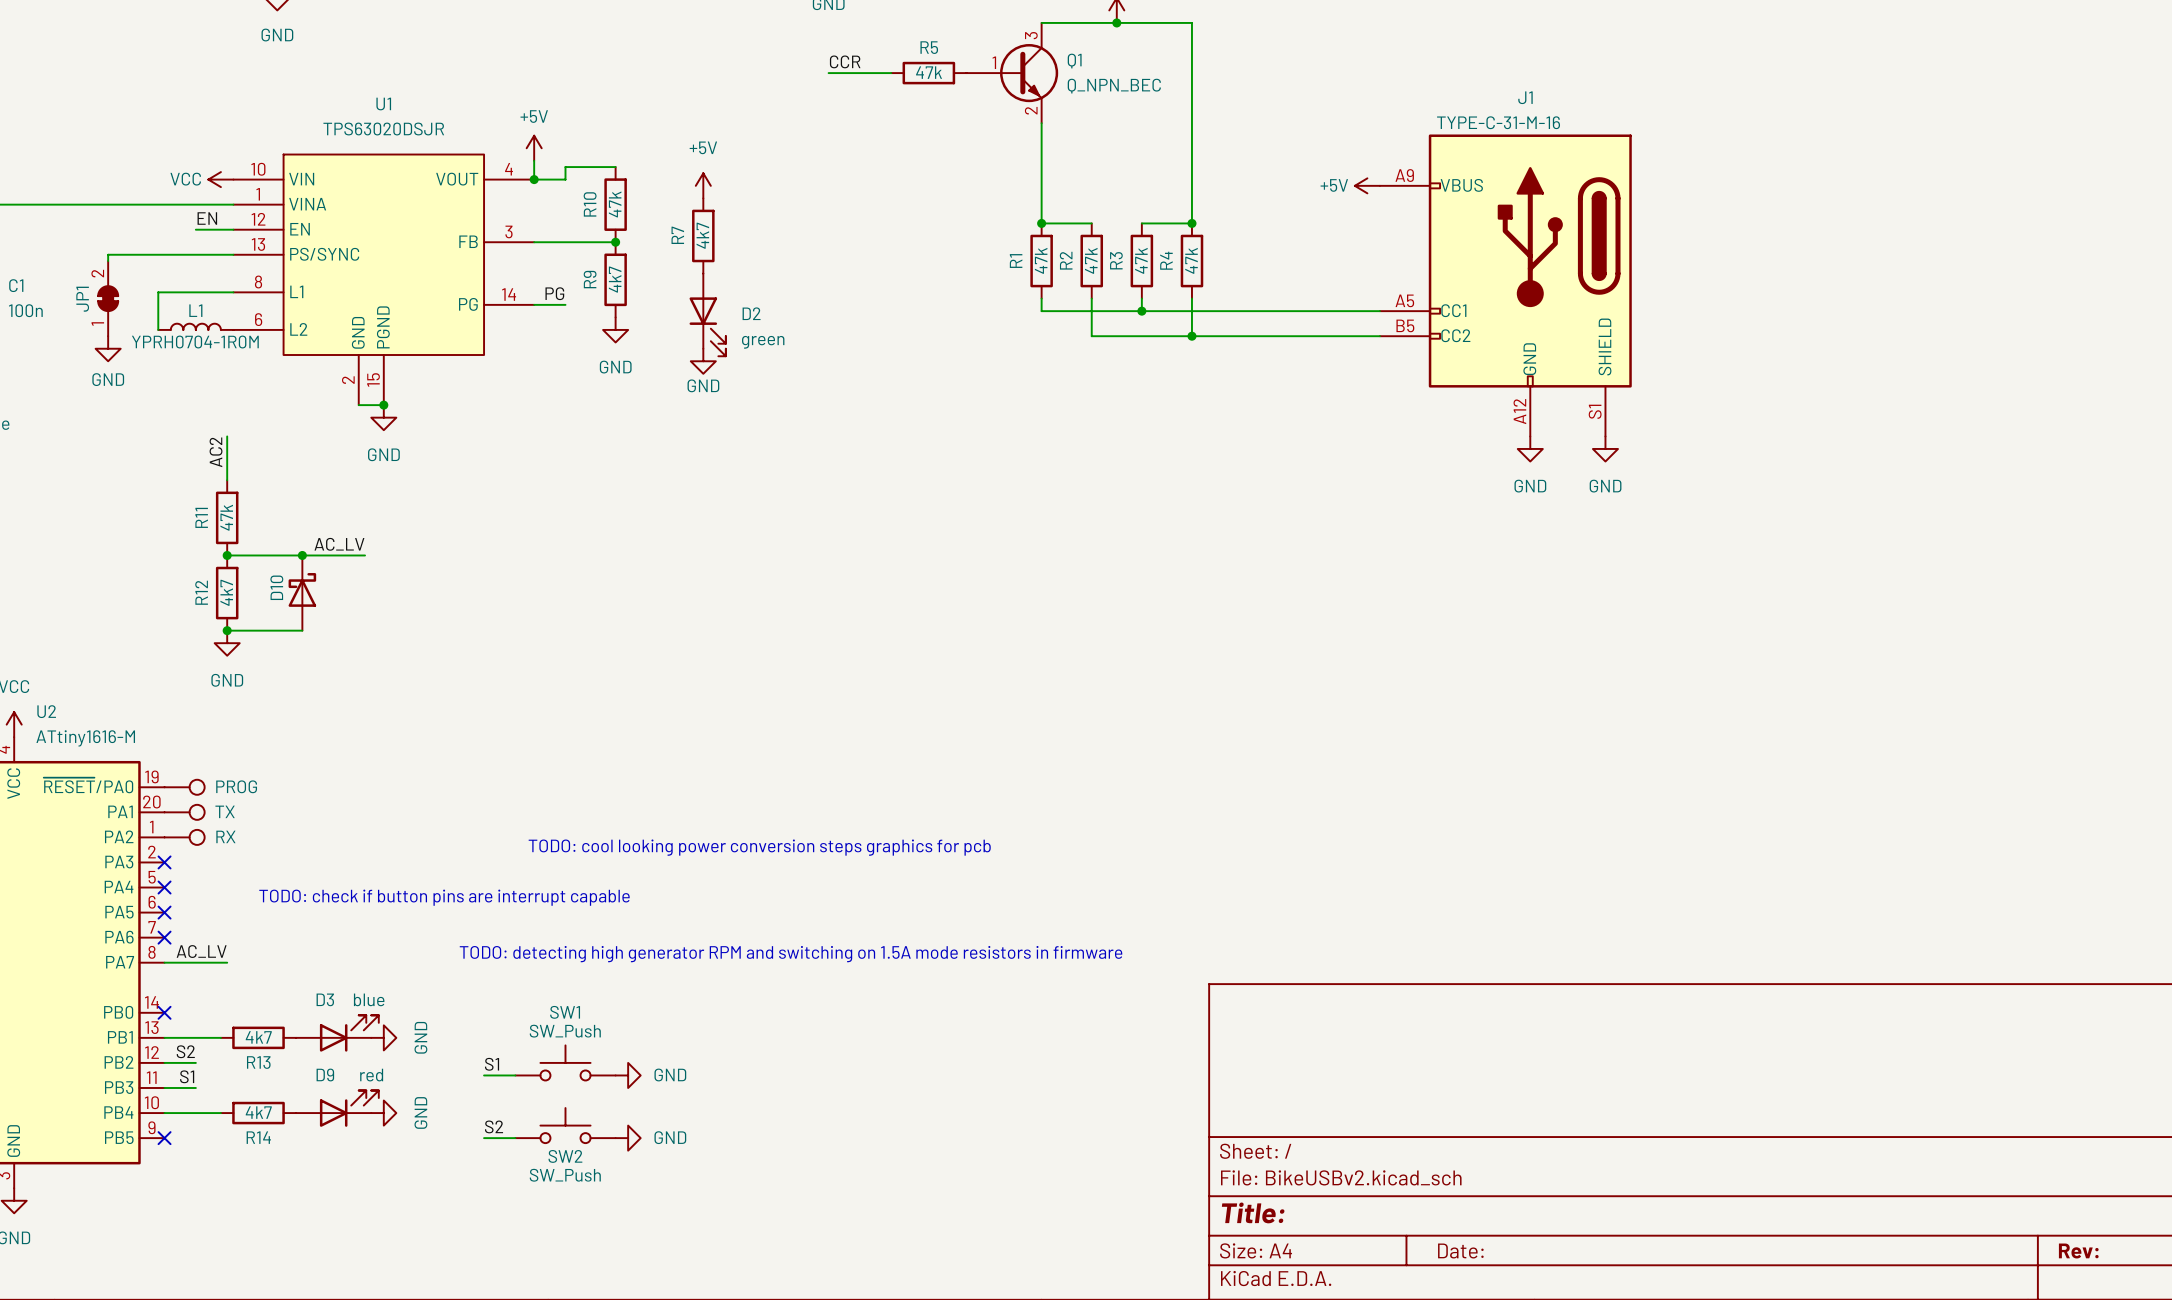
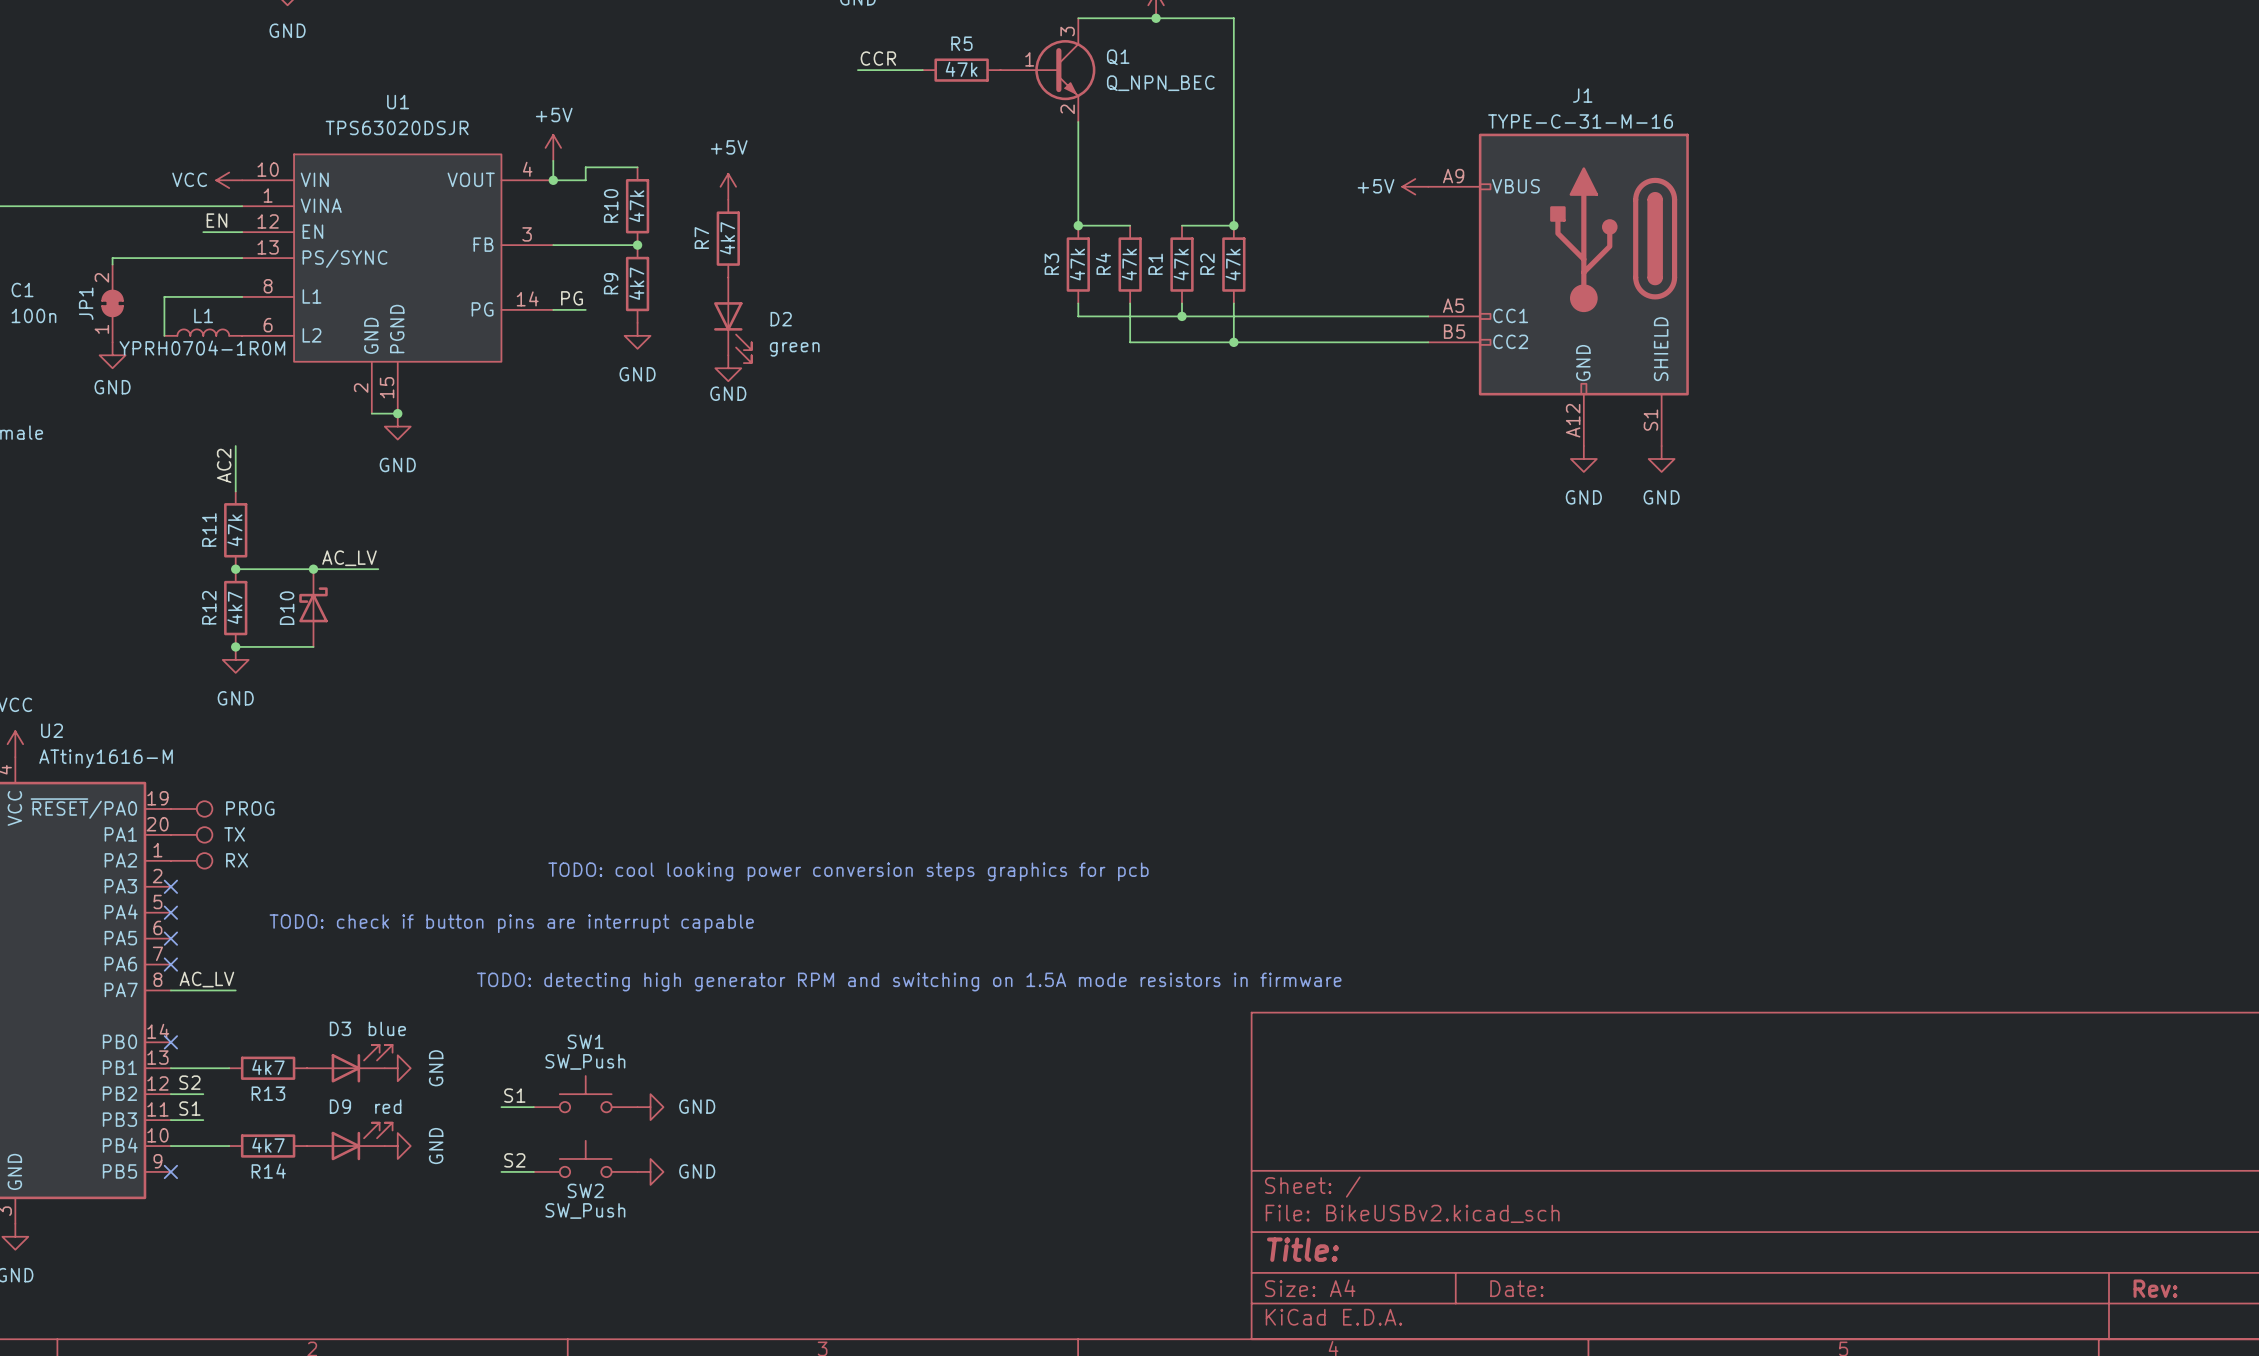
R2 name: R2 (1066, 260) -> R4 (1103, 263)
R3 name: R3 (1116, 260) -> R1 (1155, 264)
R4 name: R4 (1166, 260) -> R2 (1207, 264)
R1 name: R1 (1016, 261) -> R3 (1051, 264)

